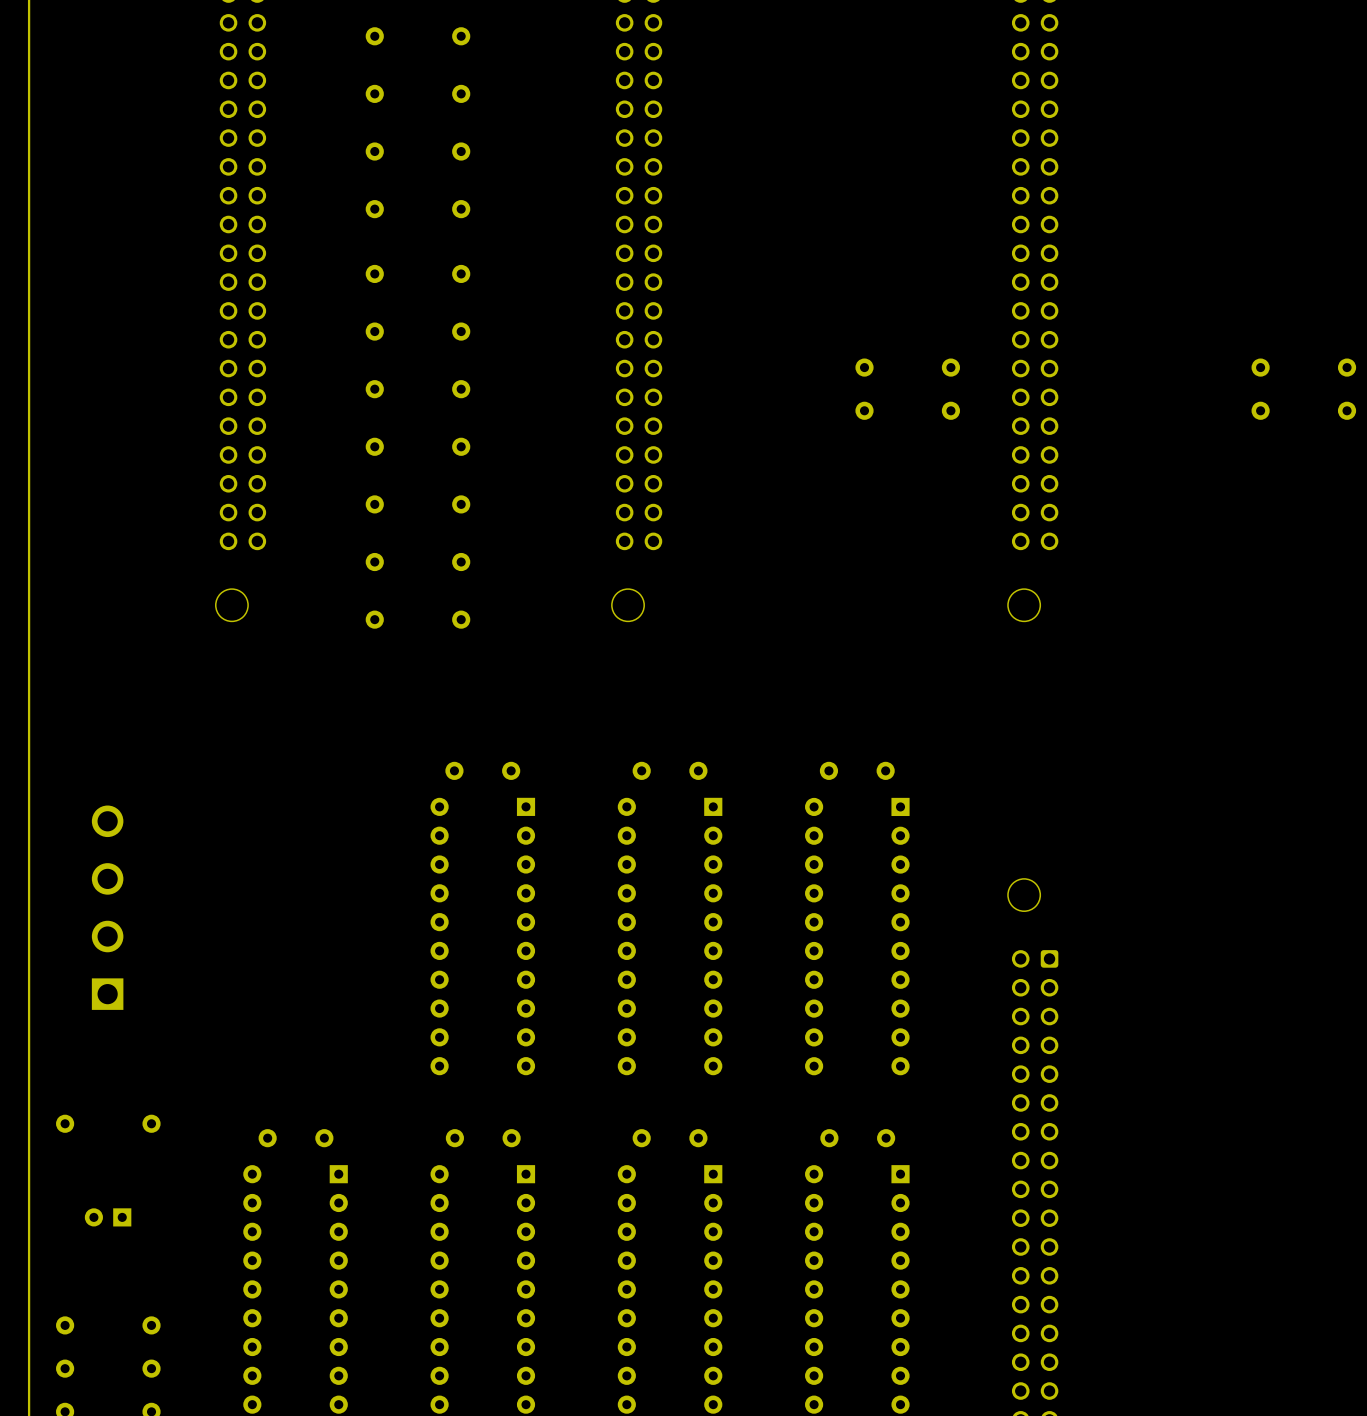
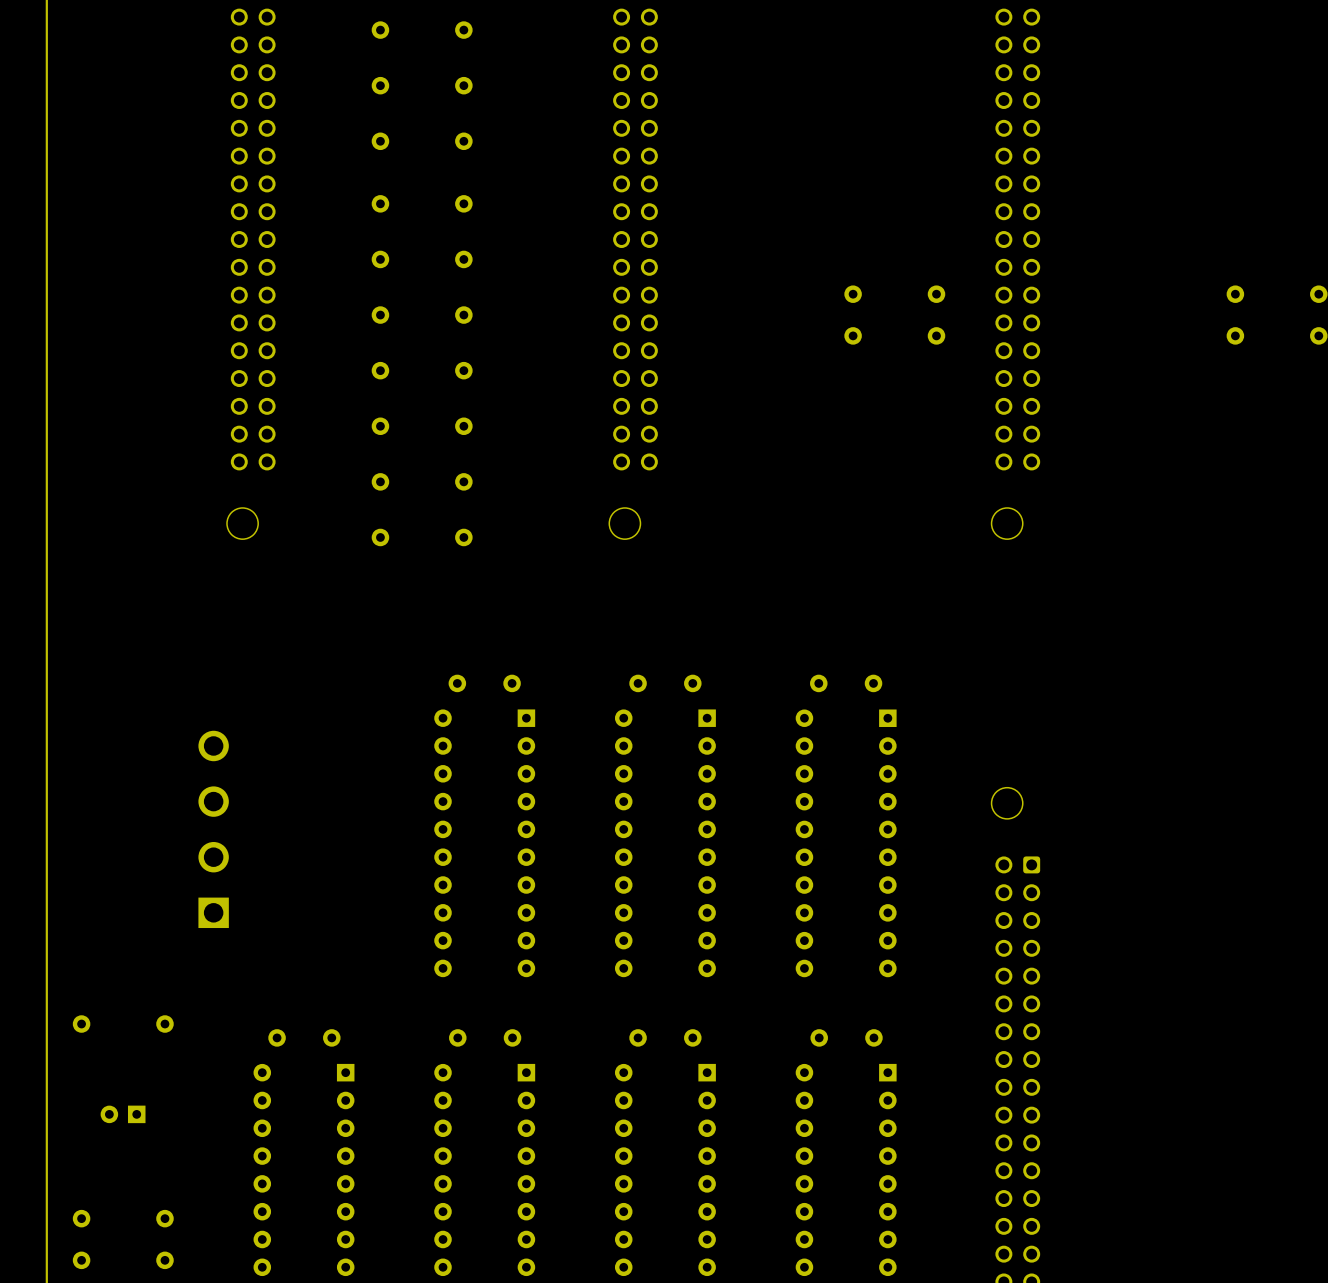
part position: (107, 907) -> (213, 829)

